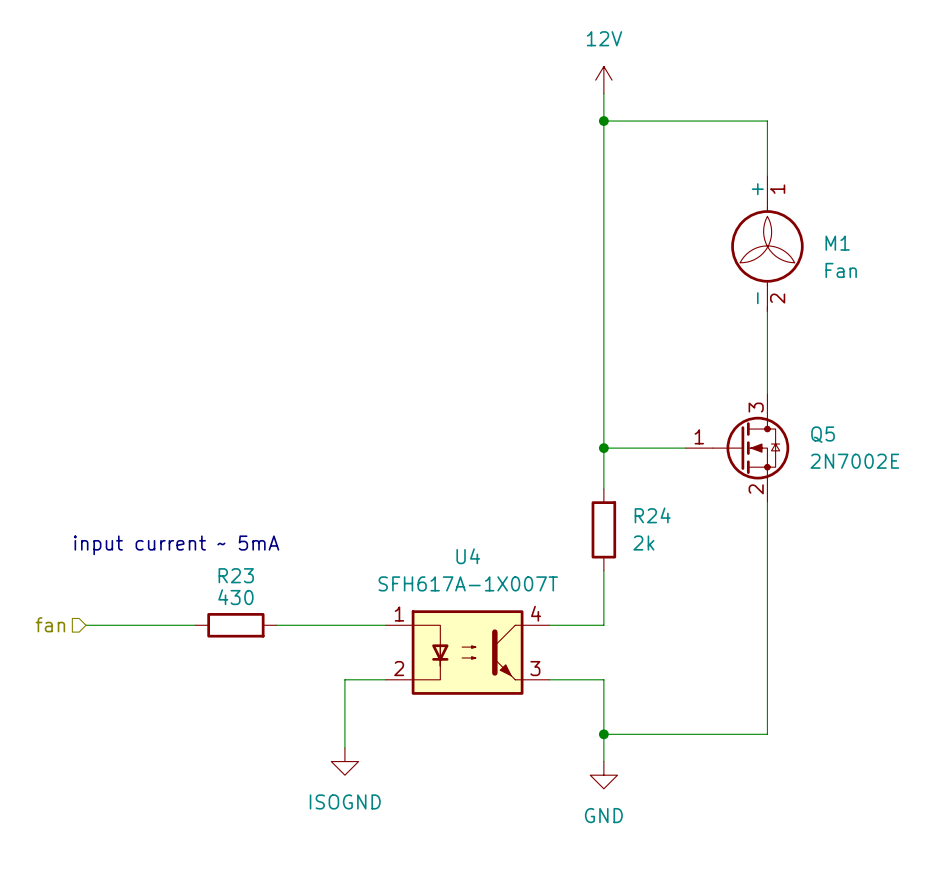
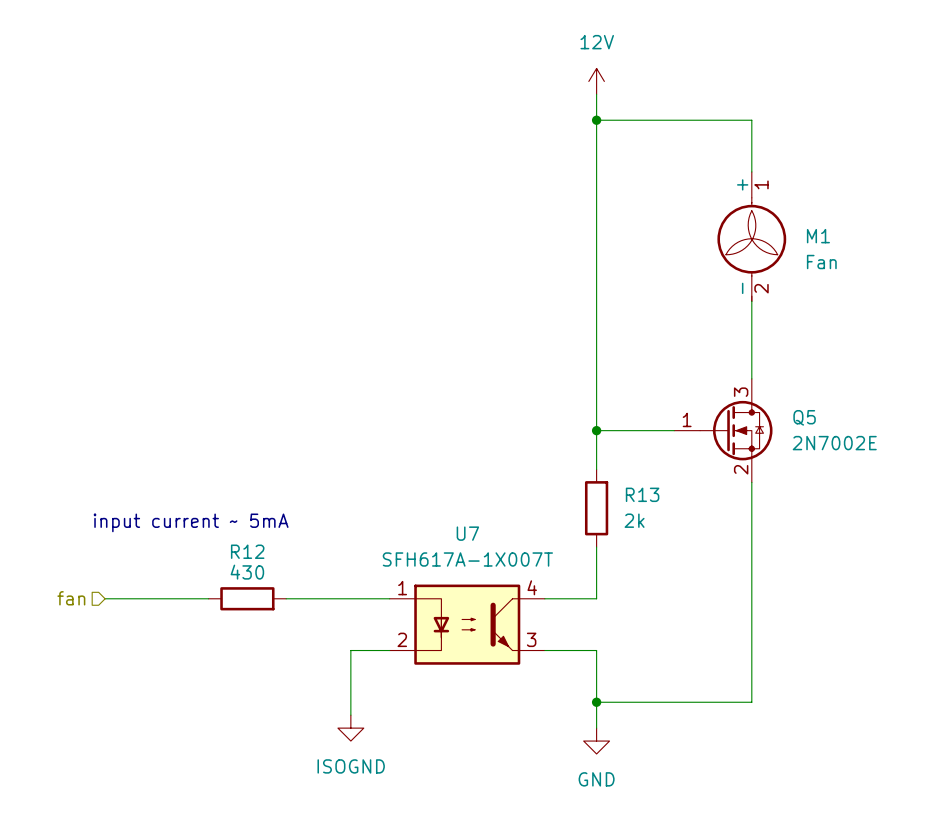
R24 name: R24 (652, 515) -> R13 (642, 494)
U4 name: U4 (468, 556) -> U7 (467, 533)
R23 name: R23 (236, 575) -> R12 (247, 551)

